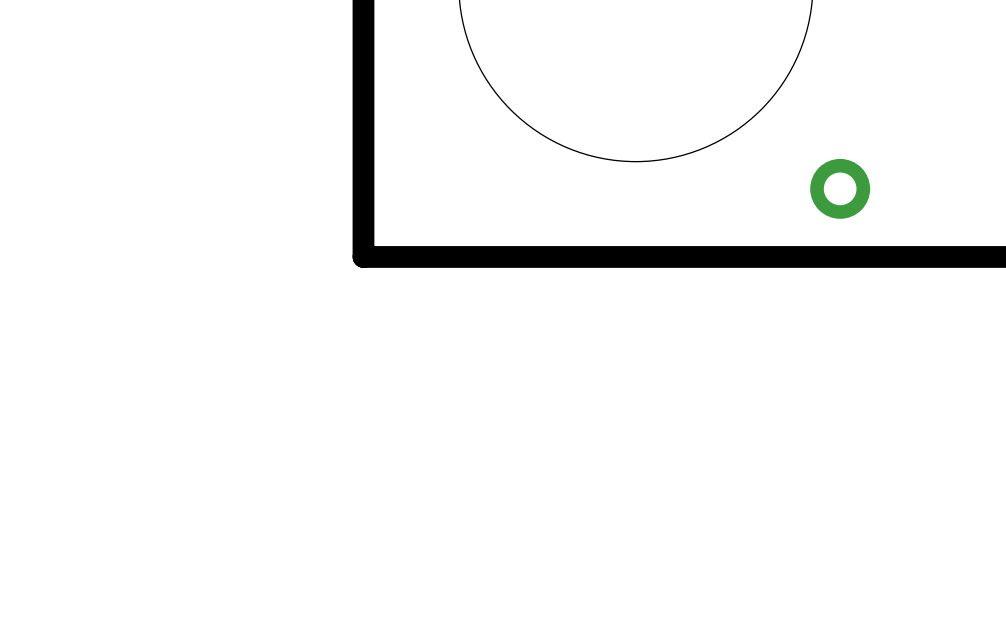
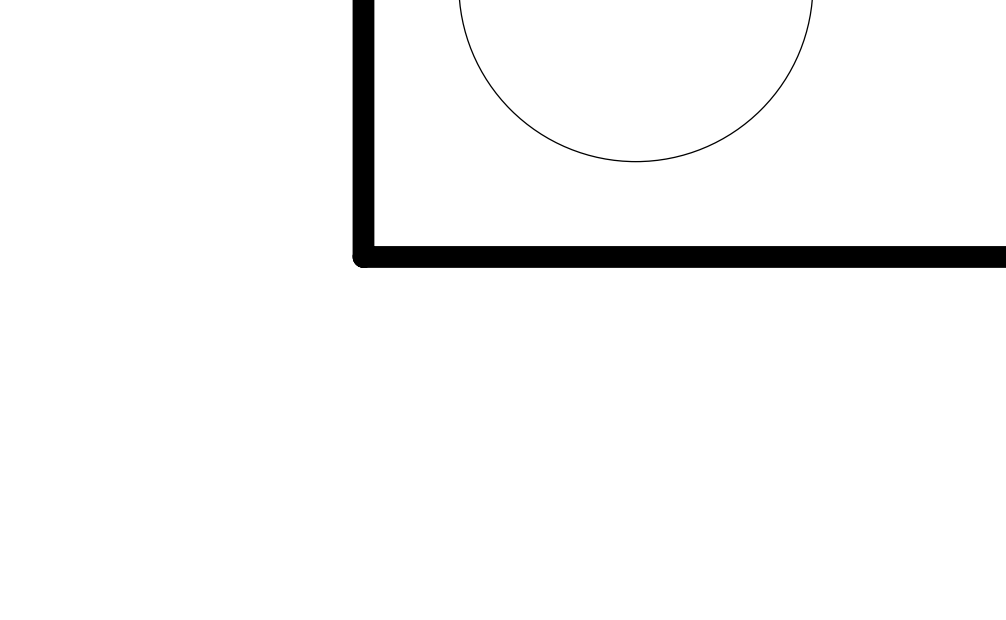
via: (840, 188) -> none

